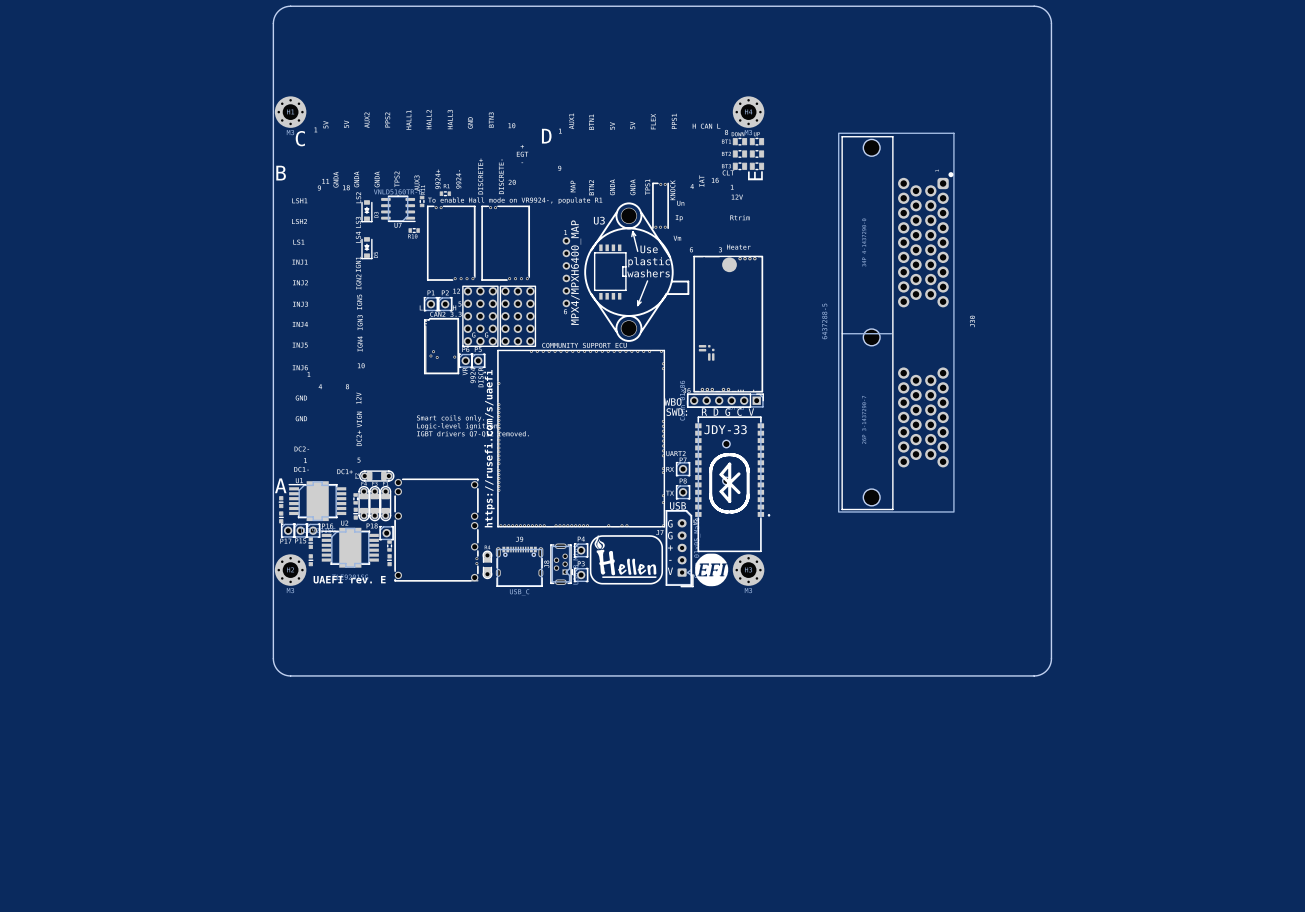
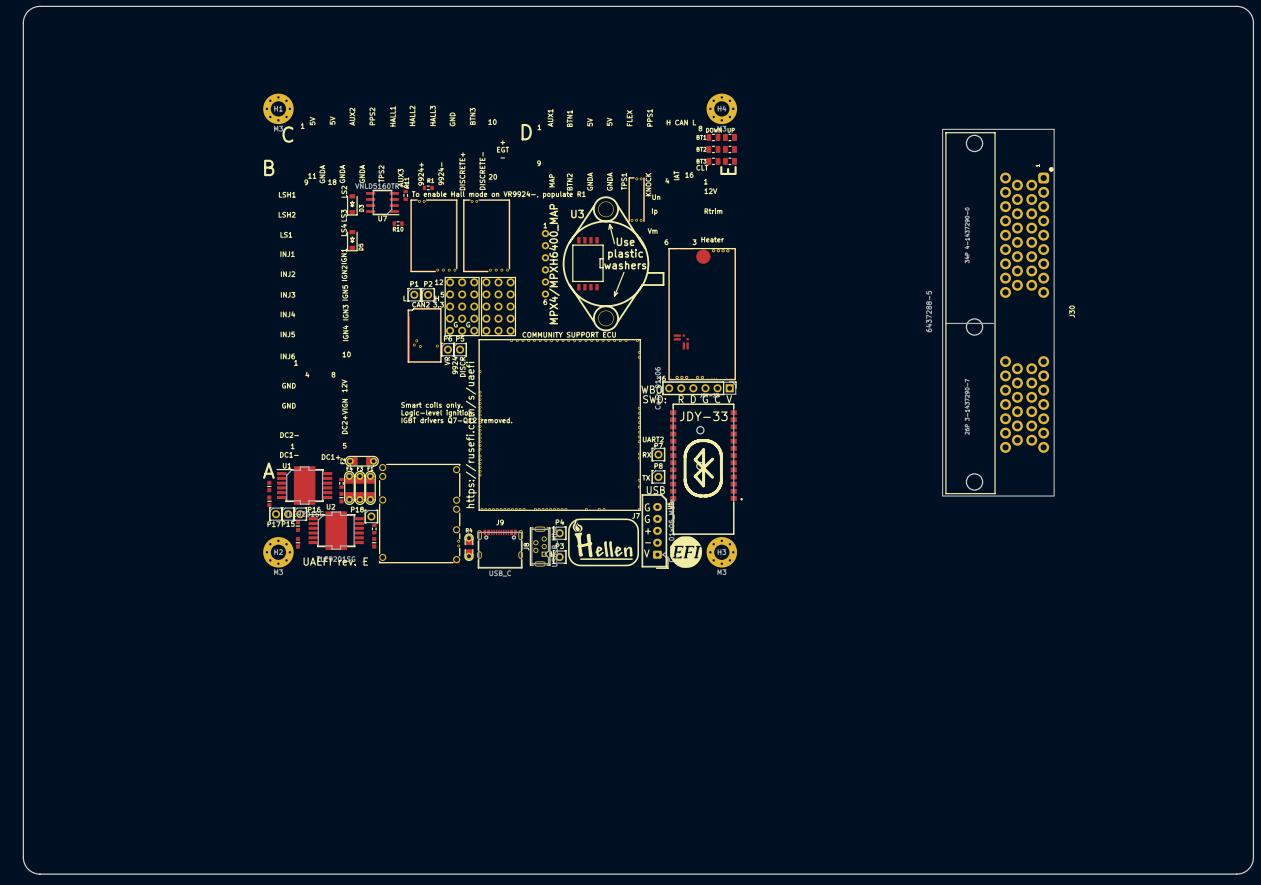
board edge: (290, 6) (278, 11) (273, 23) (273, 658) (278, 670) (290, 675) (1034, 675) (1046, 670) (1051, 658) (1051, 23) (1046, 11) (1034, 6) -> (278, 6) (40, 6) (29, 10) (23, 19) (23, 857) (26, 867) (36, 873) (1236, 874) (1248, 869) (1253, 857) (1252, 17) (1245, 8) (1236, 6) (998, 6)
part position: (896, 322) -> (998, 312)

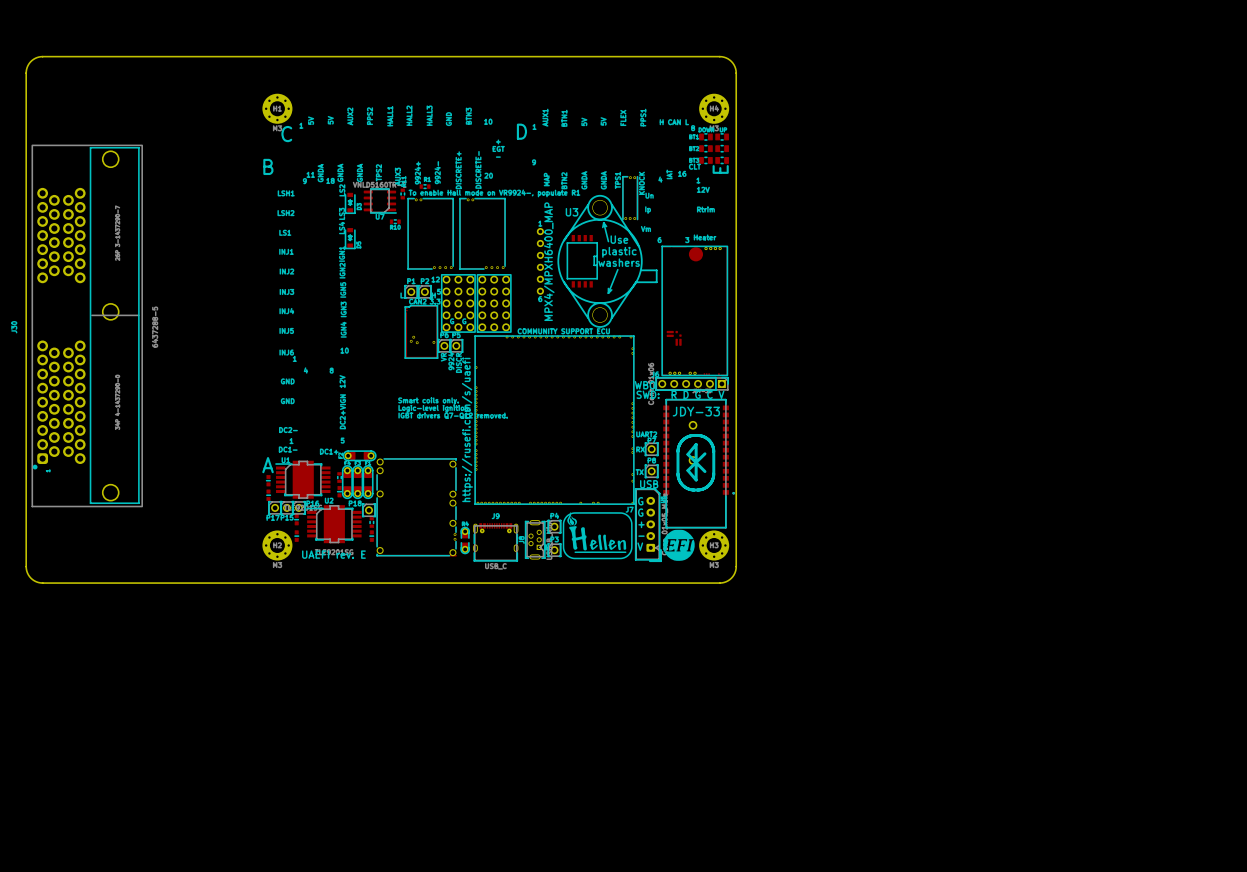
board edge: (23, 72) (23, 19) (29, 10) (40, 6) (1236, 6) (1245, 8) (1250, 14) (1253, 23) (1253, 861) (1247, 870) (1236, 874) (36, 873) (26, 867) (23, 857) (23, 573) -> (26, 73) (31, 61) (42, 56) (719, 56) (731, 61) (736, 73) (736, 566) (734, 574) (729, 579) (719, 583) (42, 583) (31, 578) (26, 566)
part rotation: 0° (998, 312) -> 180° (87, 325)
part position: (998, 312) -> (87, 325)

